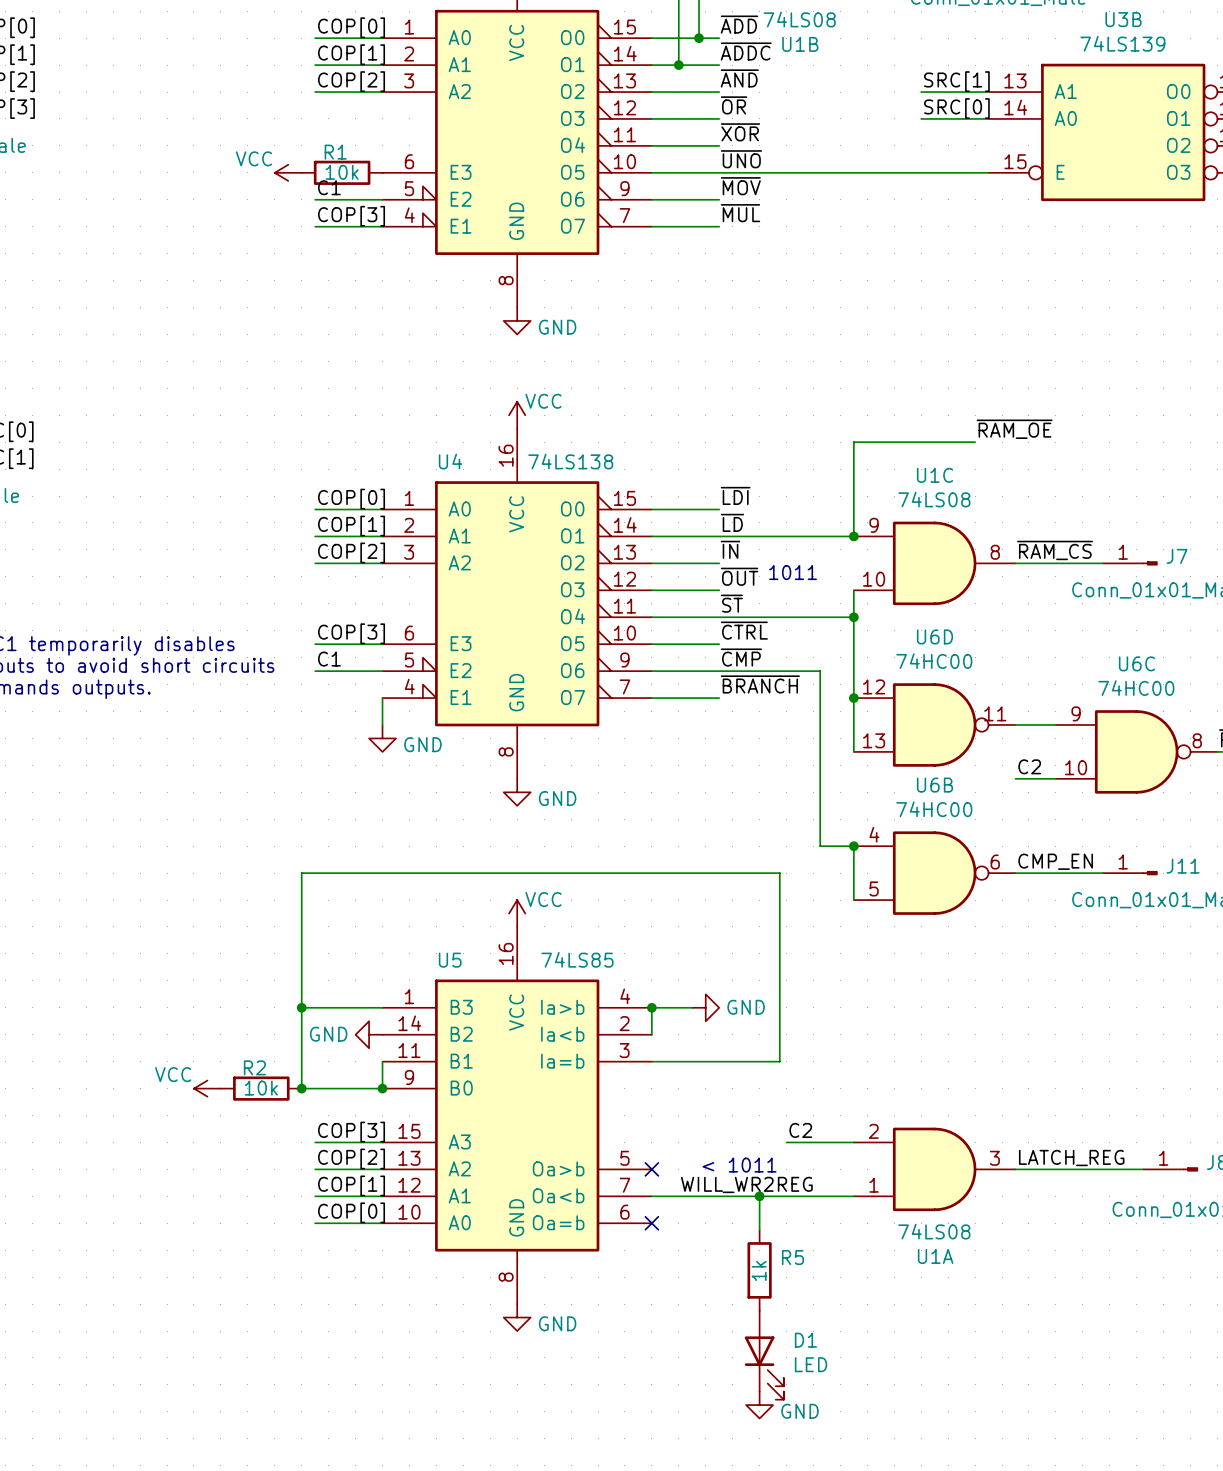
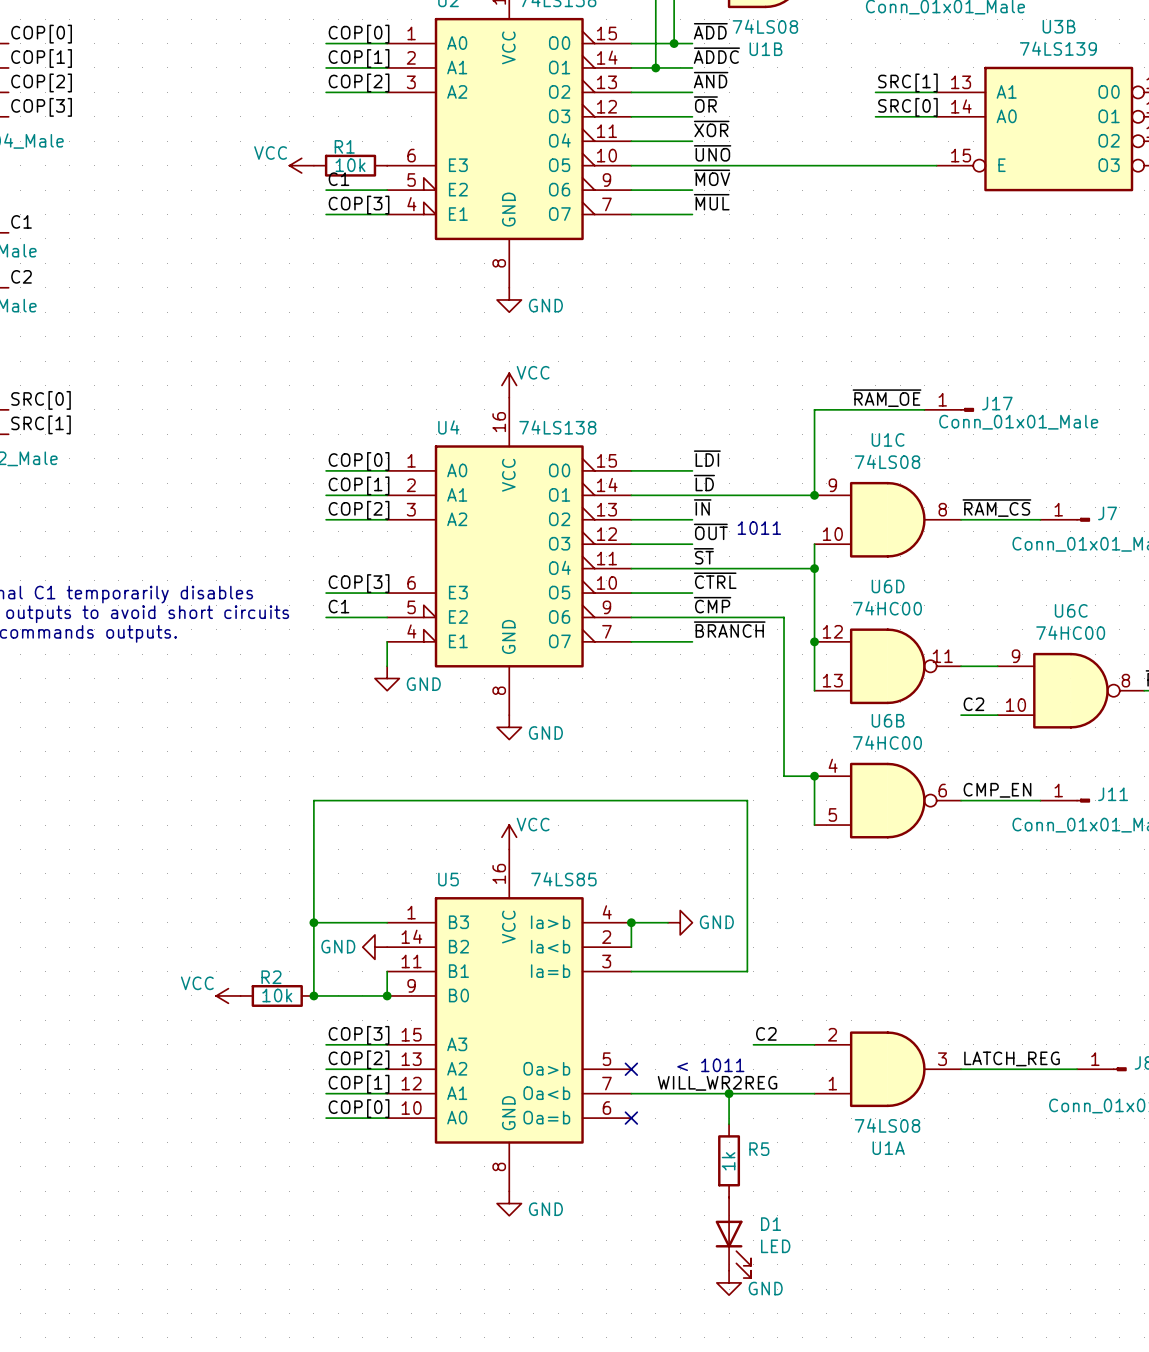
label position: ~{RAM_OE} (1014, 429) -> ~{RAM_OE} (887, 398)
J17: none -> Conn_01x01_Male (949, 409)

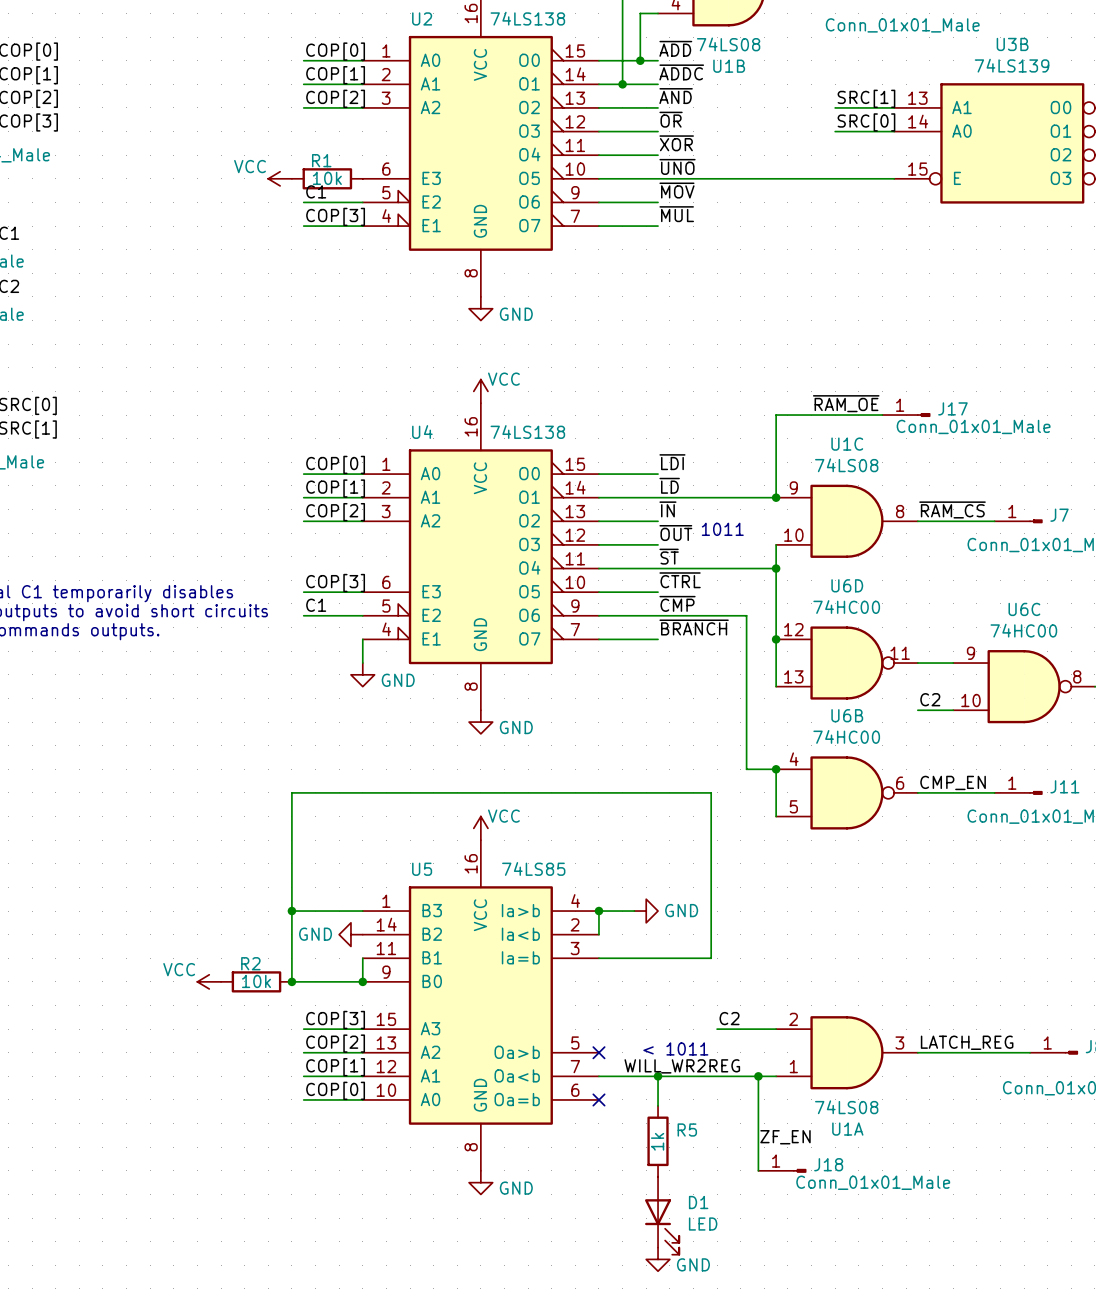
junction: none -> (658, 1076)
wire: (729, 1093) (729, 1124) -> (658, 1076) (658, 1105)
junction: (729, 1093) -> none
wire: none -> (758, 1076) (758, 1170)
junction: none -> (758, 1076)
label: none -> ZF_EN (785, 1137)
R5 position: (729, 1160) -> (658, 1141)
J18: none -> Conn_01x01_Male (782, 1170)
D1 position: (733, 1237) -> (662, 1215)
power symbol position: GND (729, 1282) -> GND (658, 1259)

